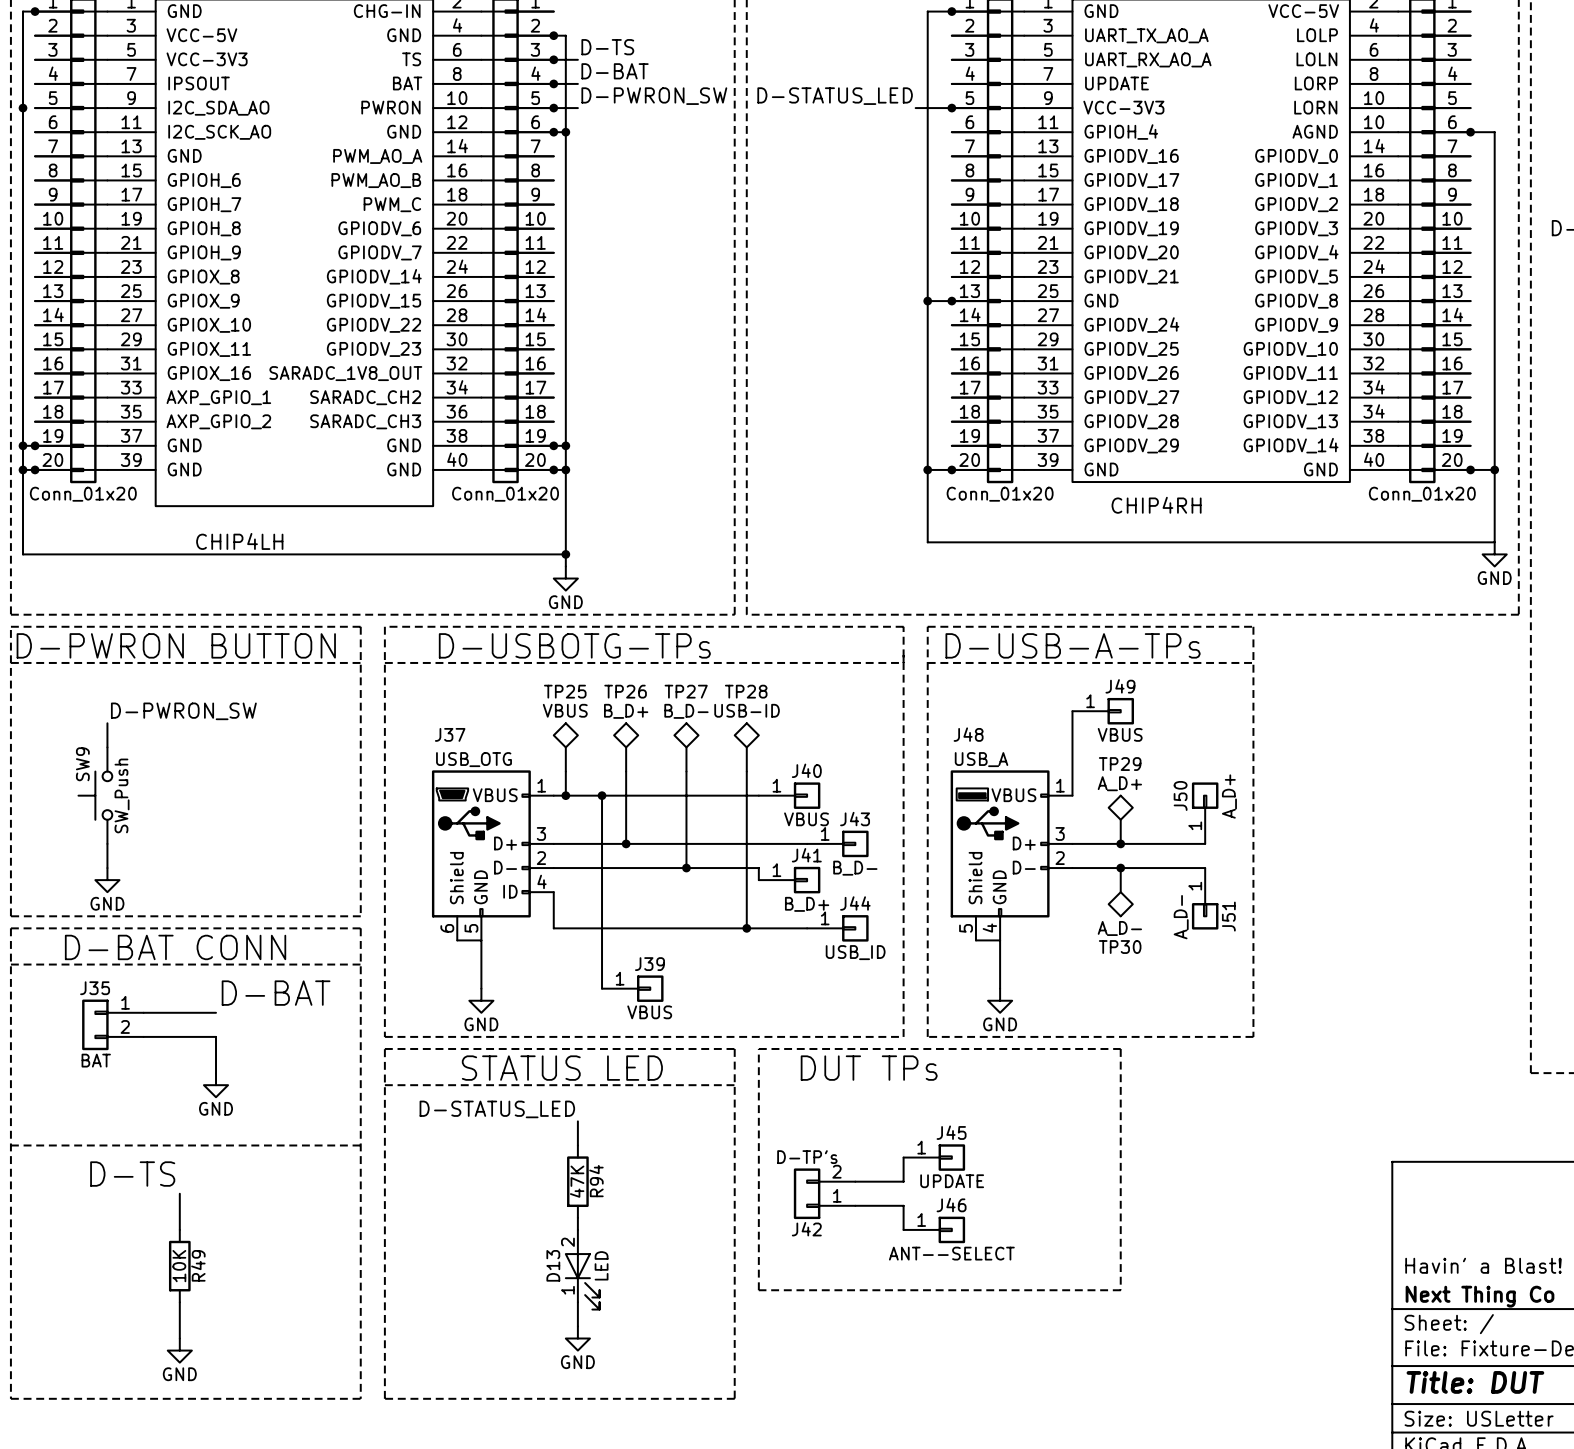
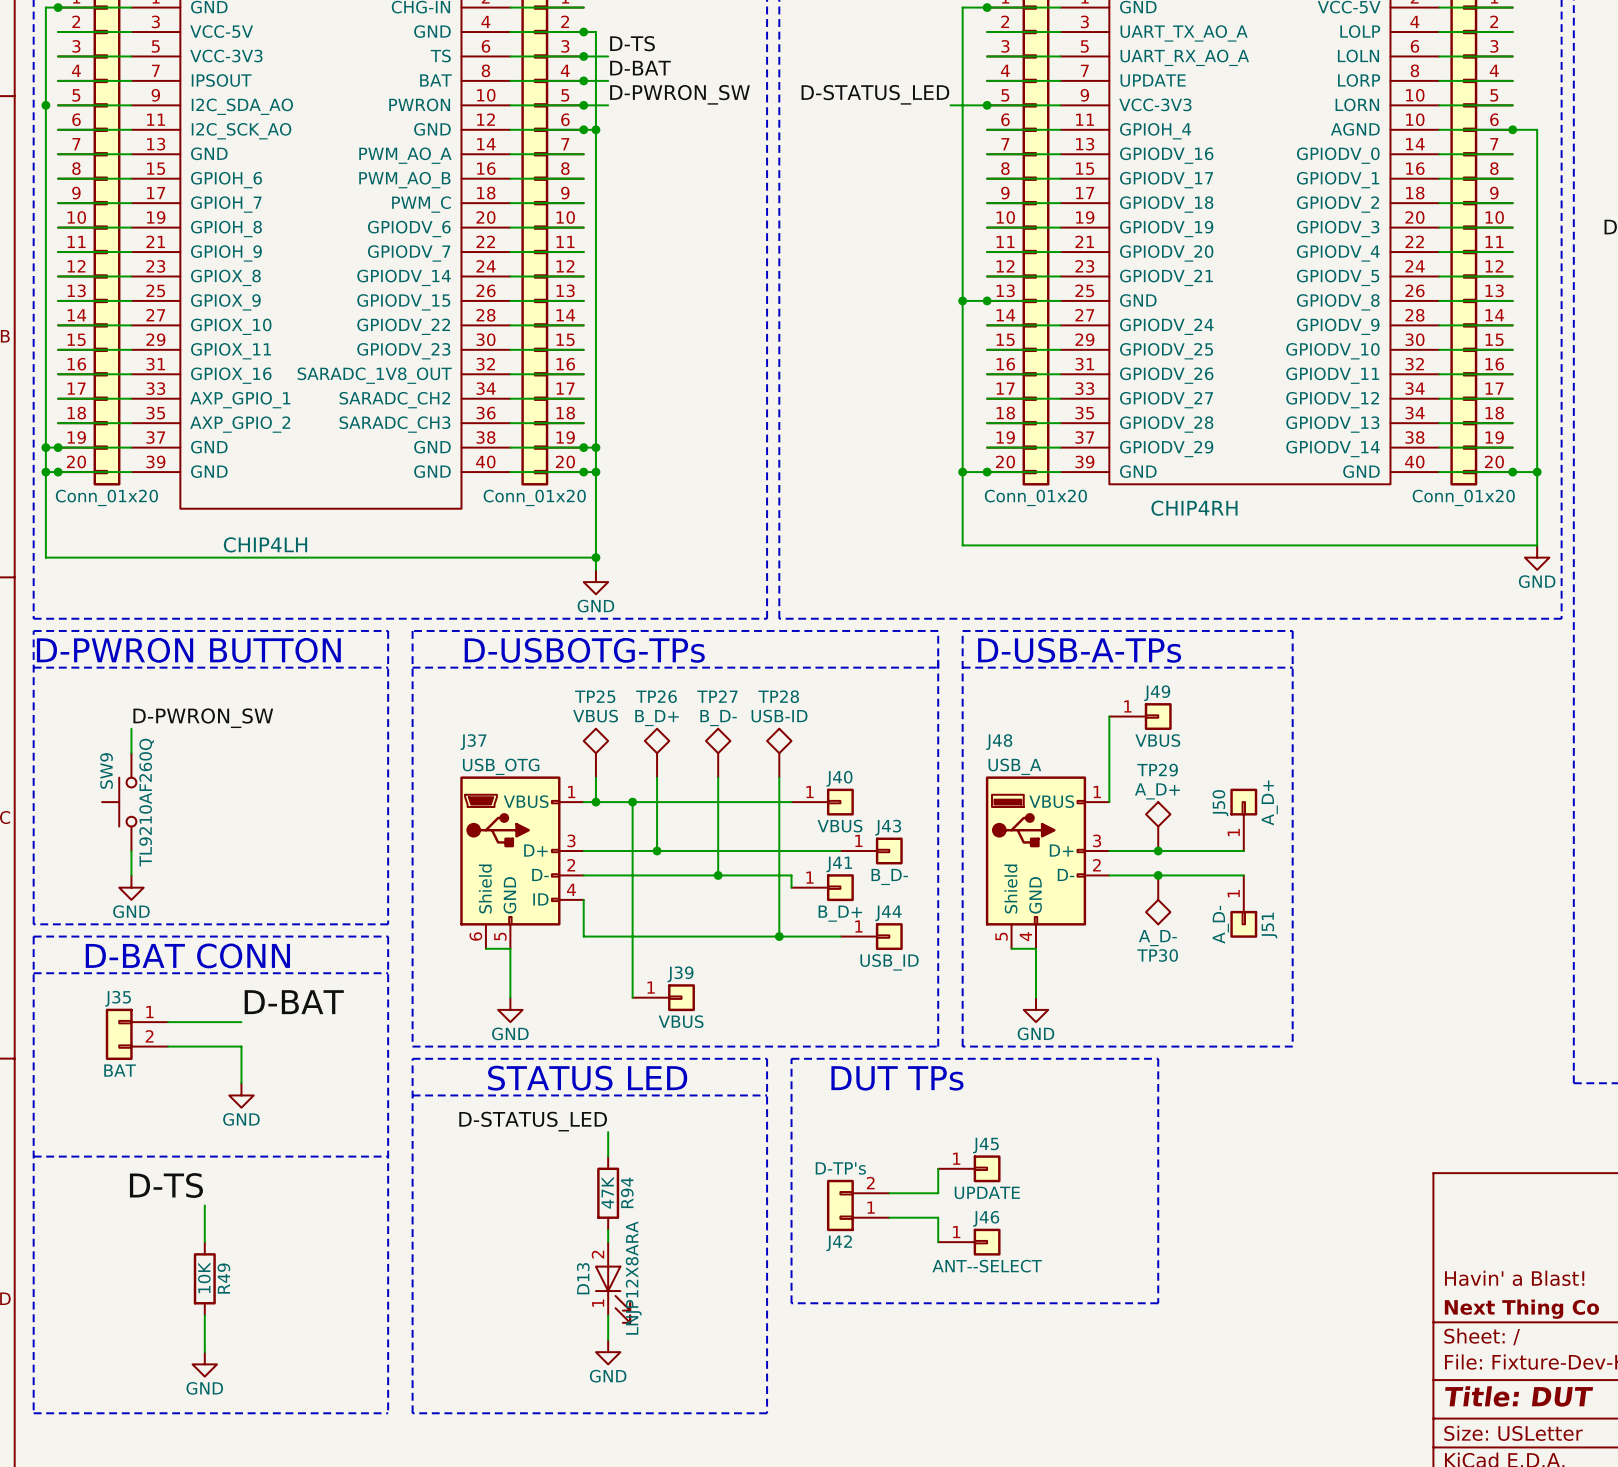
SW9 value: SW_Push (122, 795) -> TL9210AF260Q (146, 802)
D13 value: LED (601, 1265) -> LNJP12X8ARA (633, 1278)

